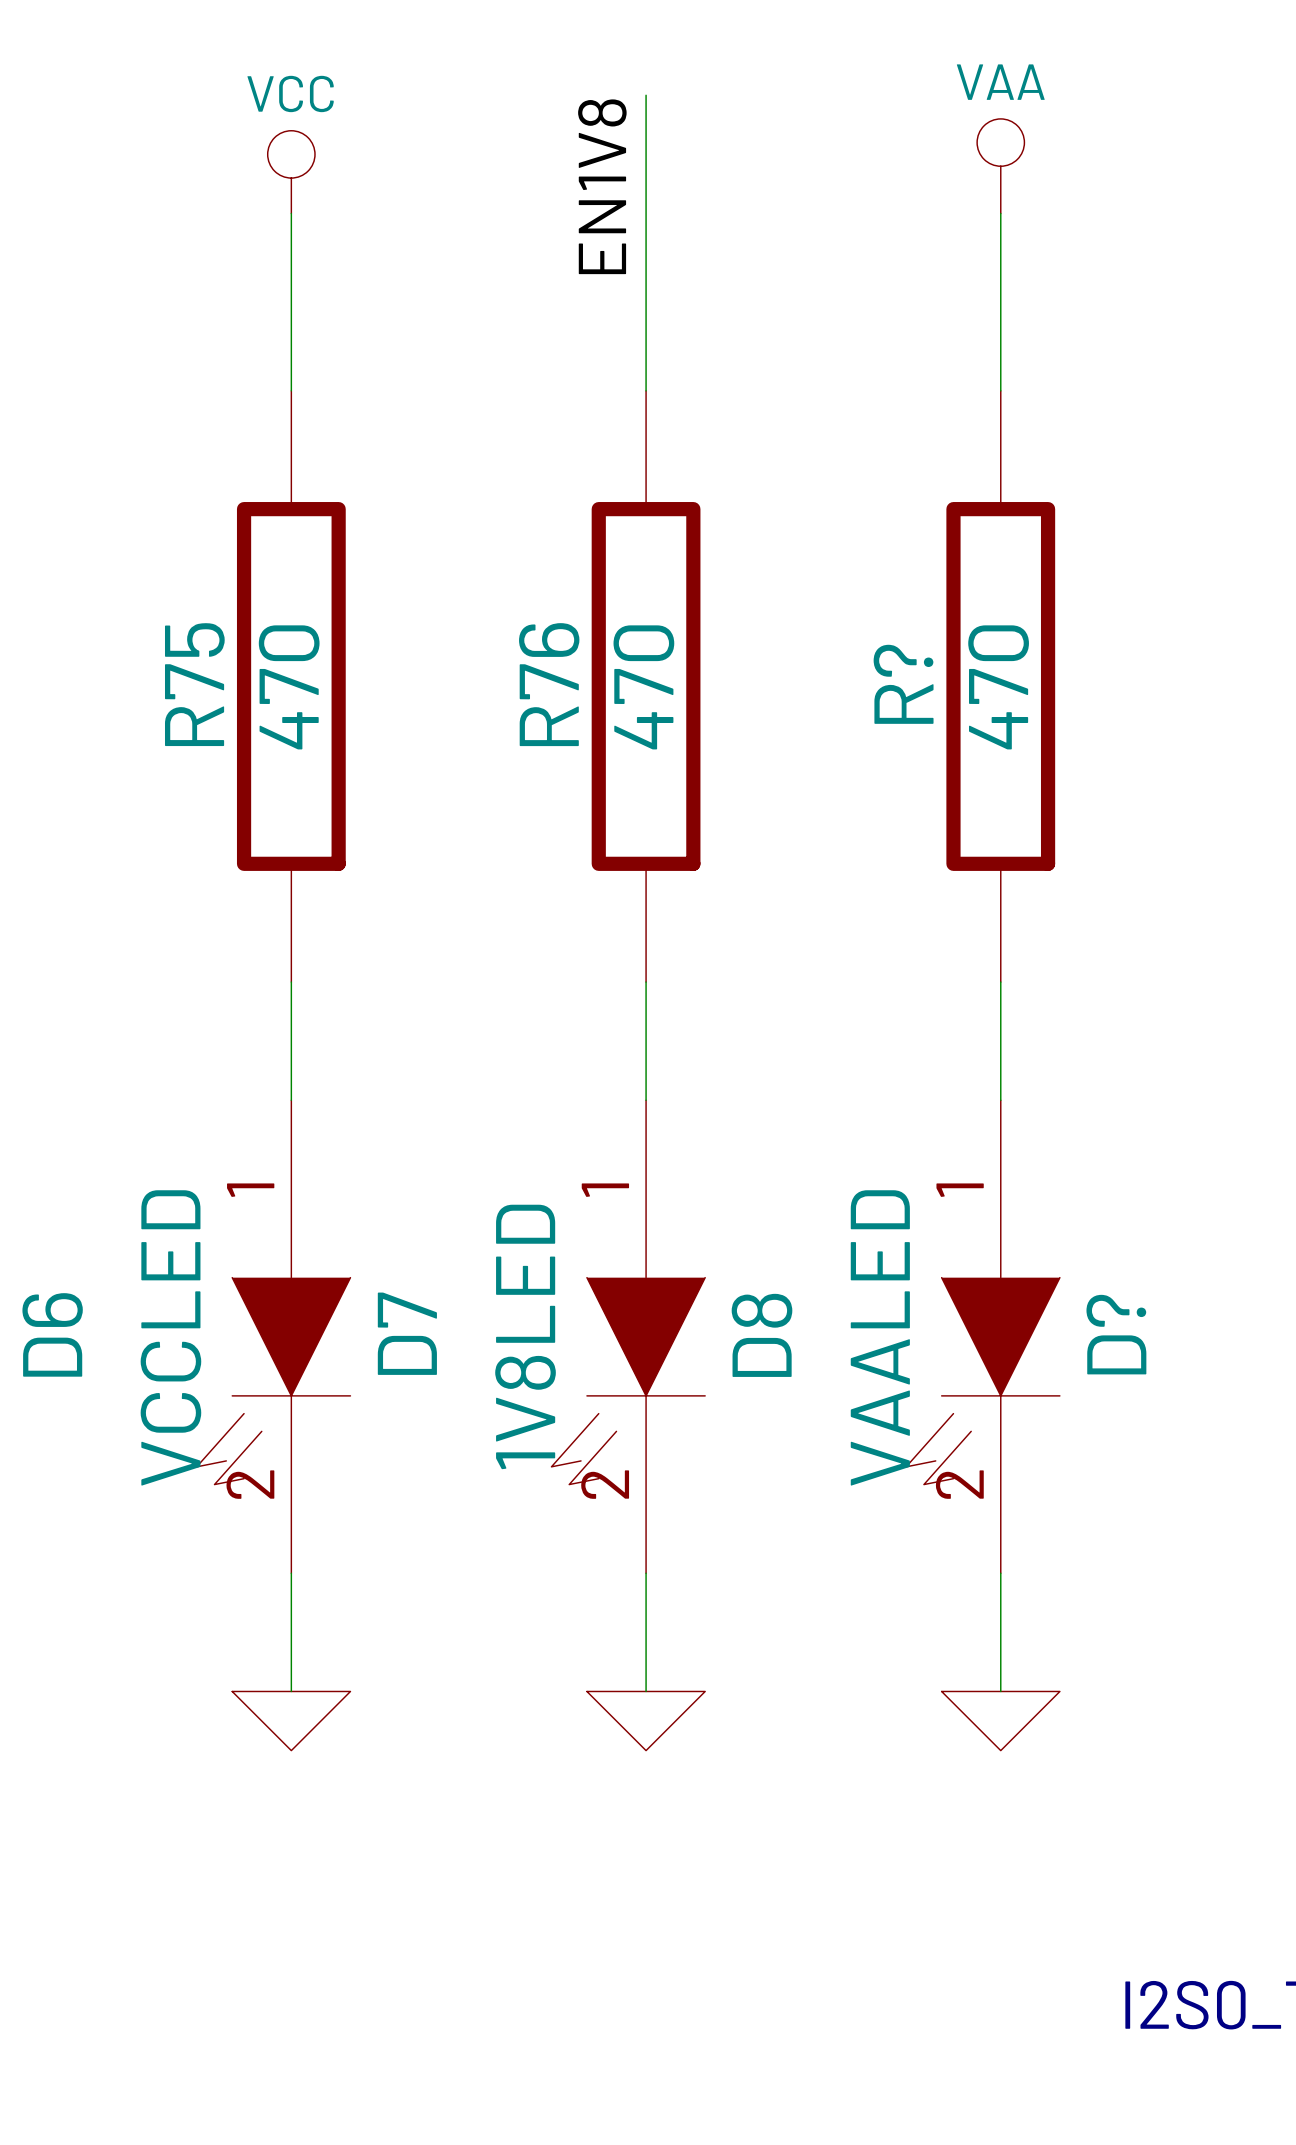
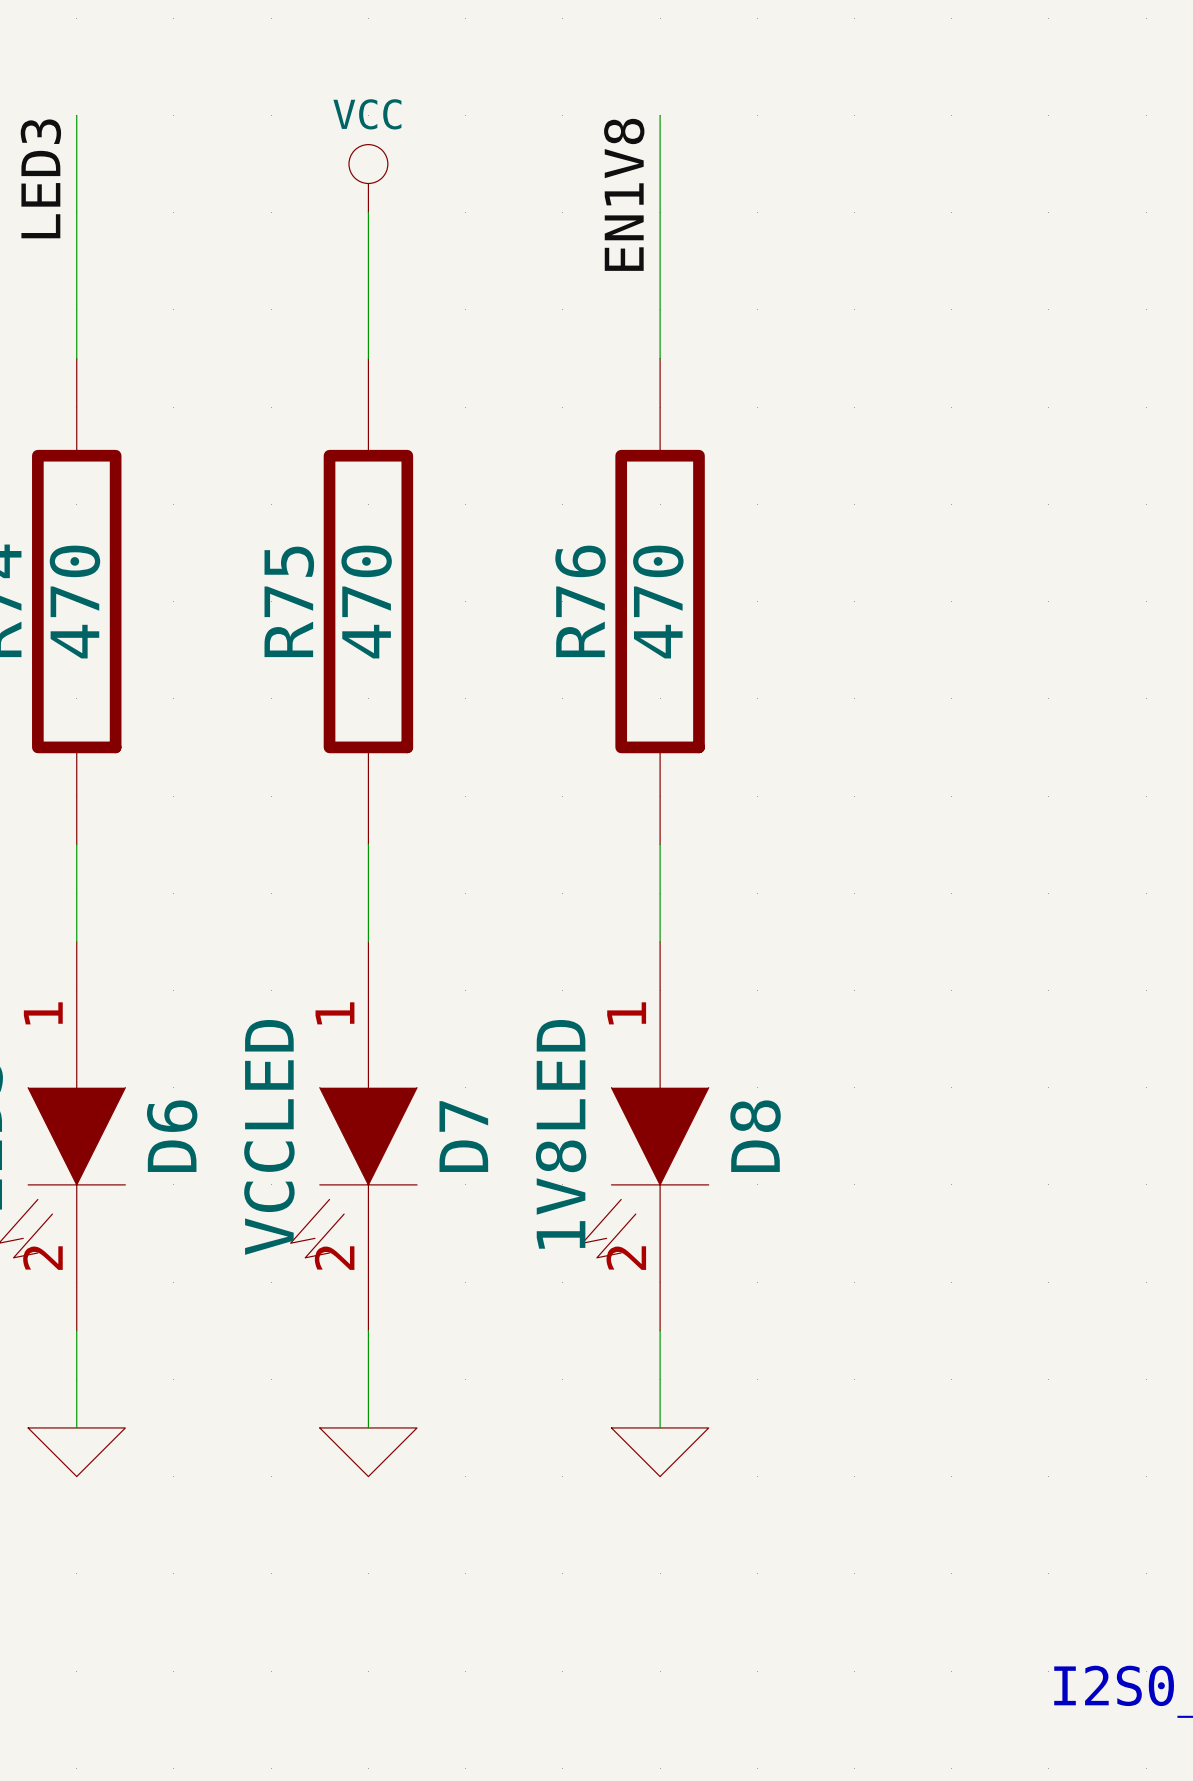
power symbol: VAA (1000, 166) -> none
wire: (1000, 213) (1000, 390) -> none
R?: 470 (1000, 686) -> none
wire: (1000, 982) (1000, 1100) -> none
D?: VAALED (983, 1336) -> none
wire: (1000, 1573) (1000, 1691) -> none
power symbol: (1000, 1721) -> none

